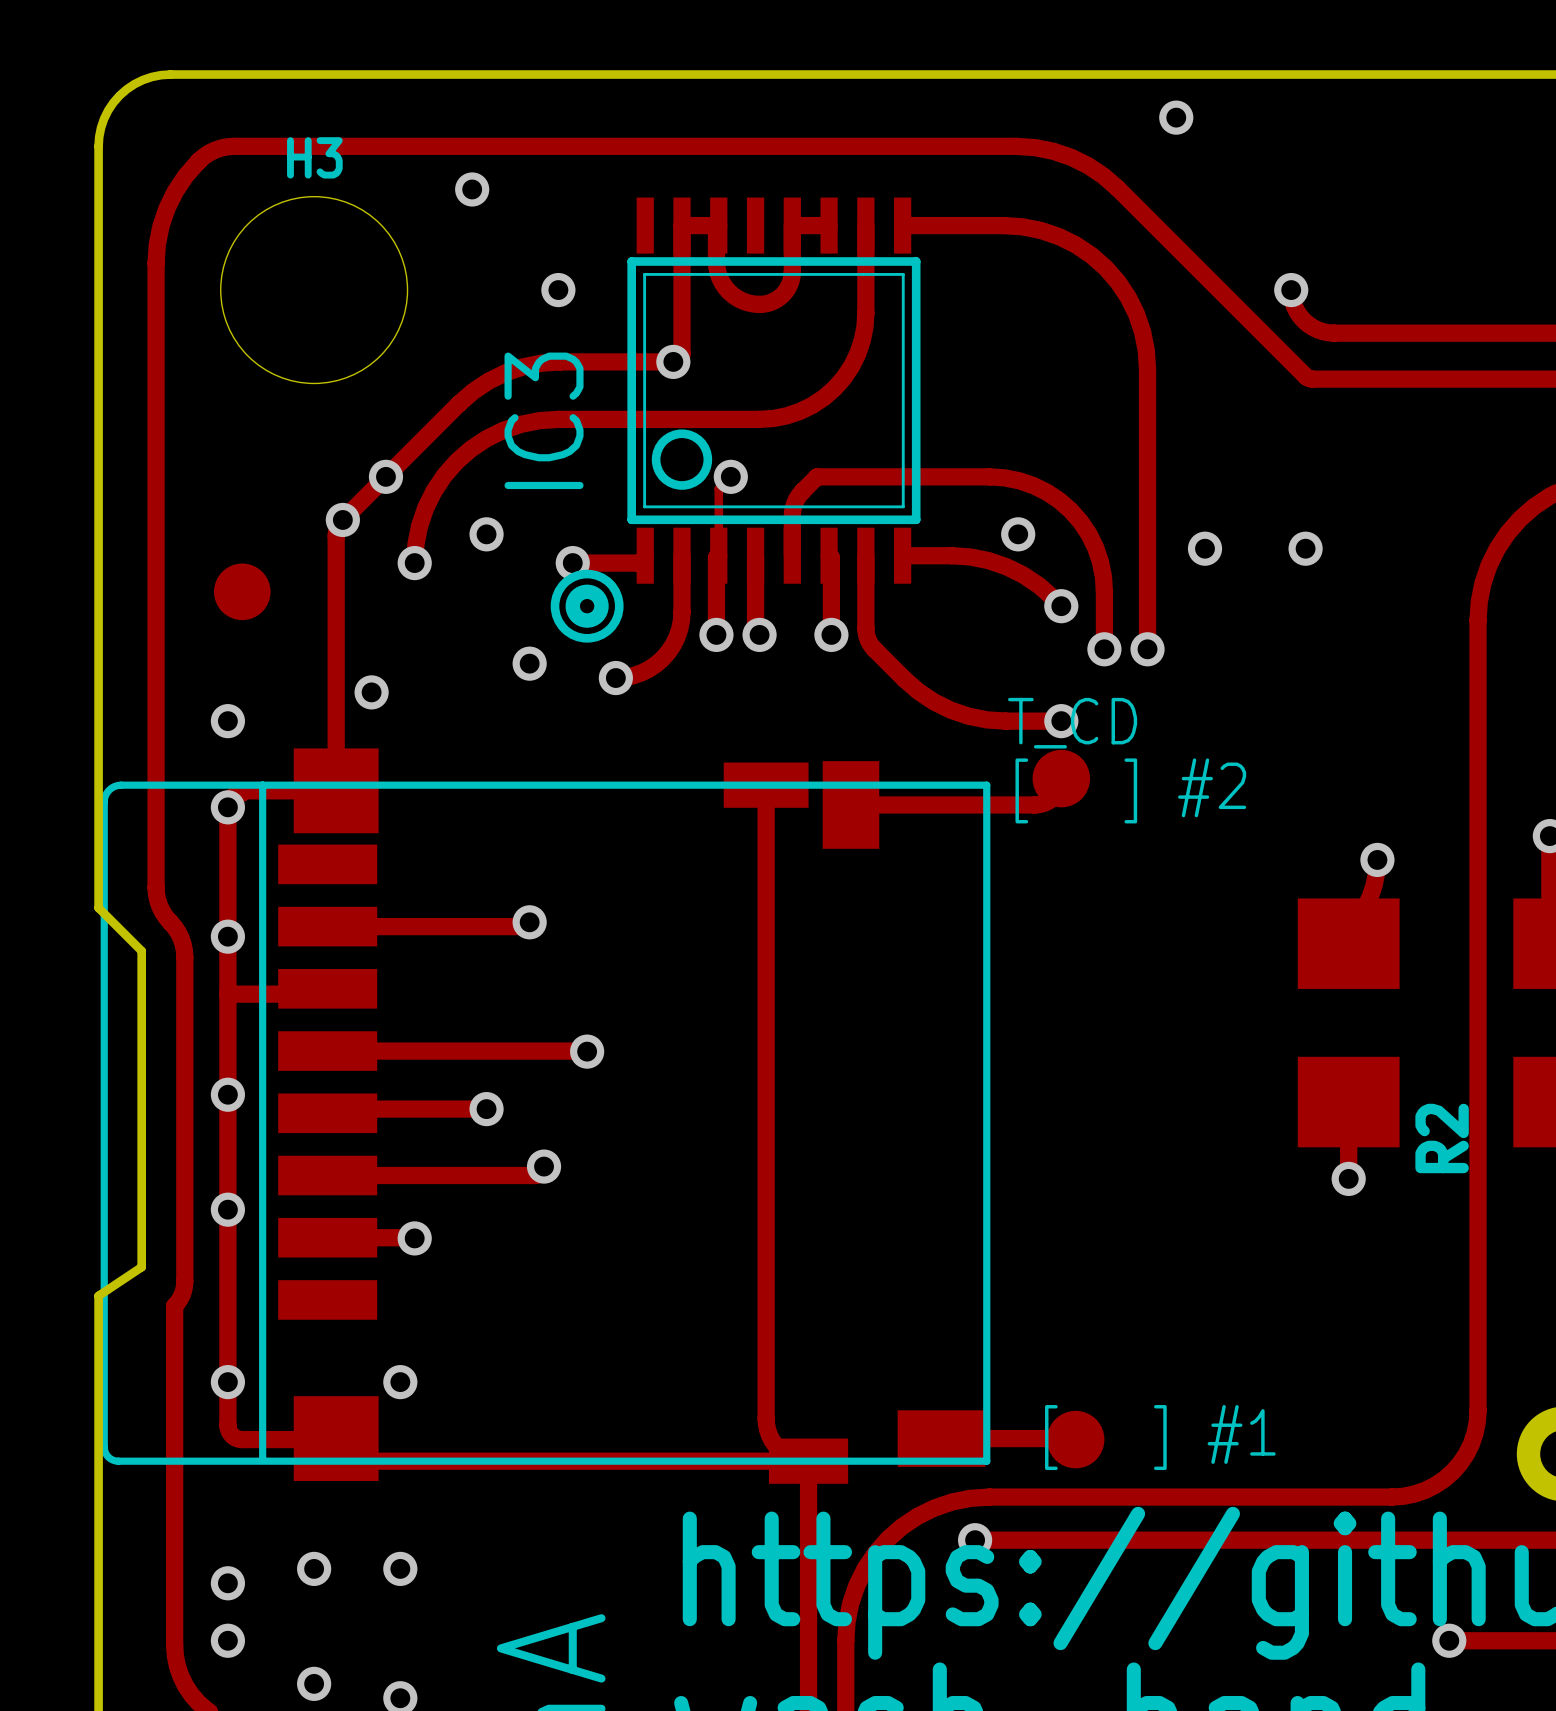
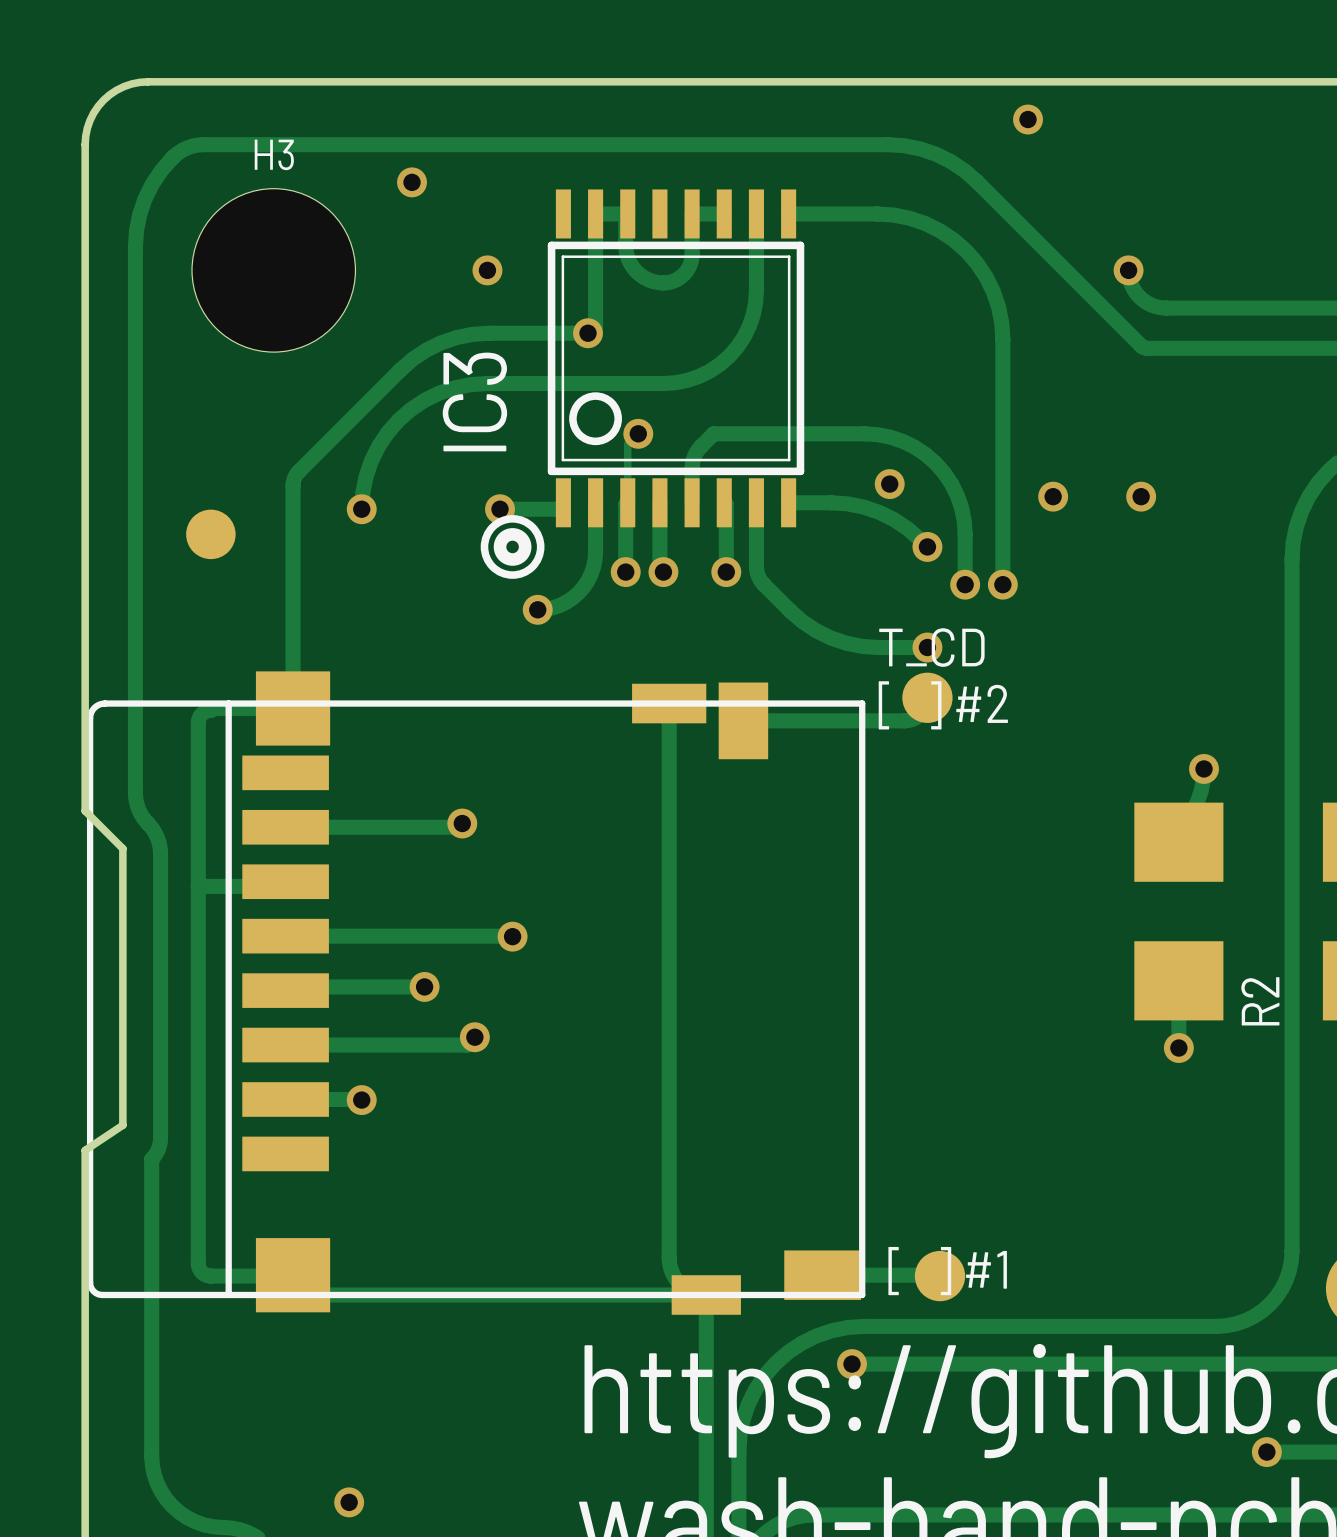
via: (385, 476) -> none
via: (342, 519) -> none
via: (486, 534) -> none
via: (529, 663) -> none
via: (371, 692) -> none
via: (227, 721) -> none
via: (227, 807) -> none
via: (227, 936) -> none
via: (227, 1094) -> none
via: (227, 1209) -> none
via: (227, 1382) -> none
via: (400, 1382) -> none
via: (314, 1568) -> none
via: (400, 1568) -> none
via: (227, 1583) -> none
via: (227, 1640) -> none
via: (314, 1683) -> none

